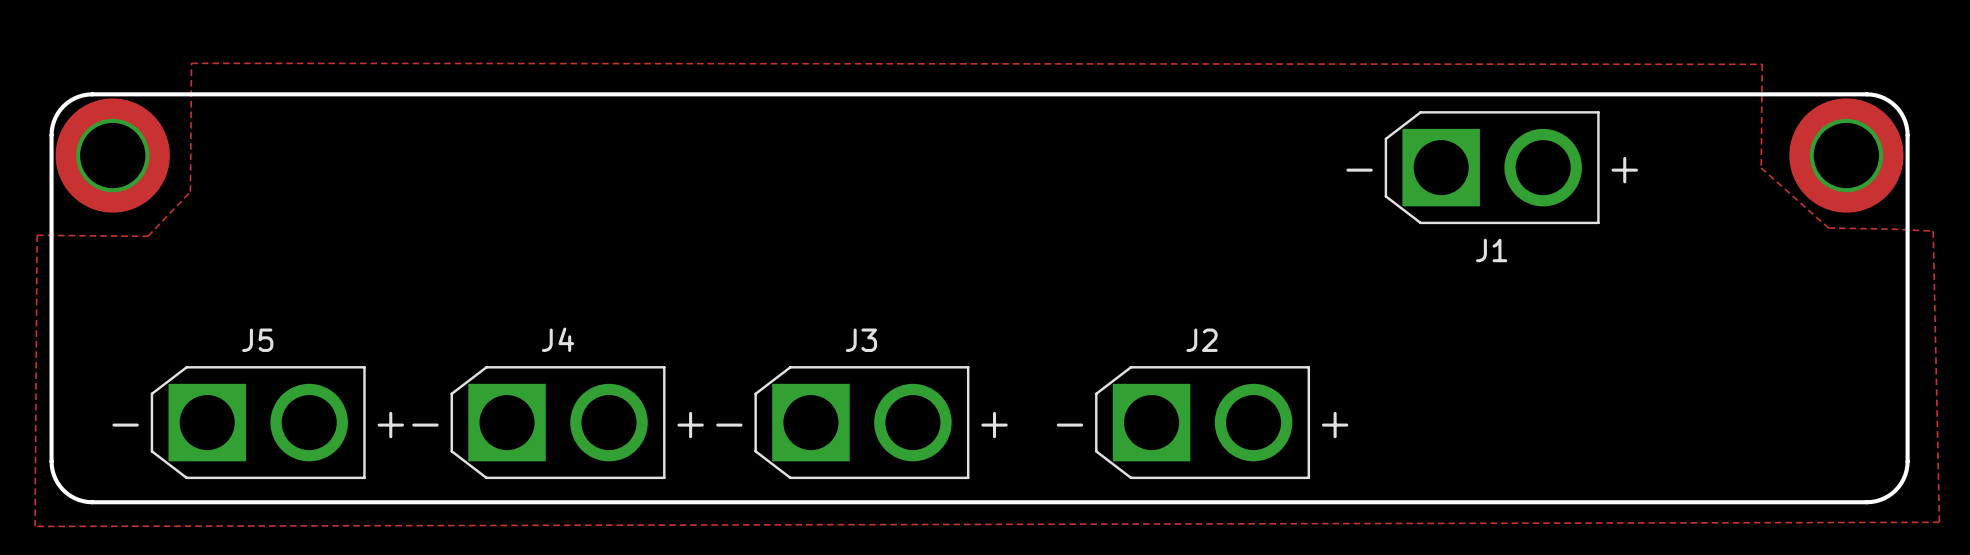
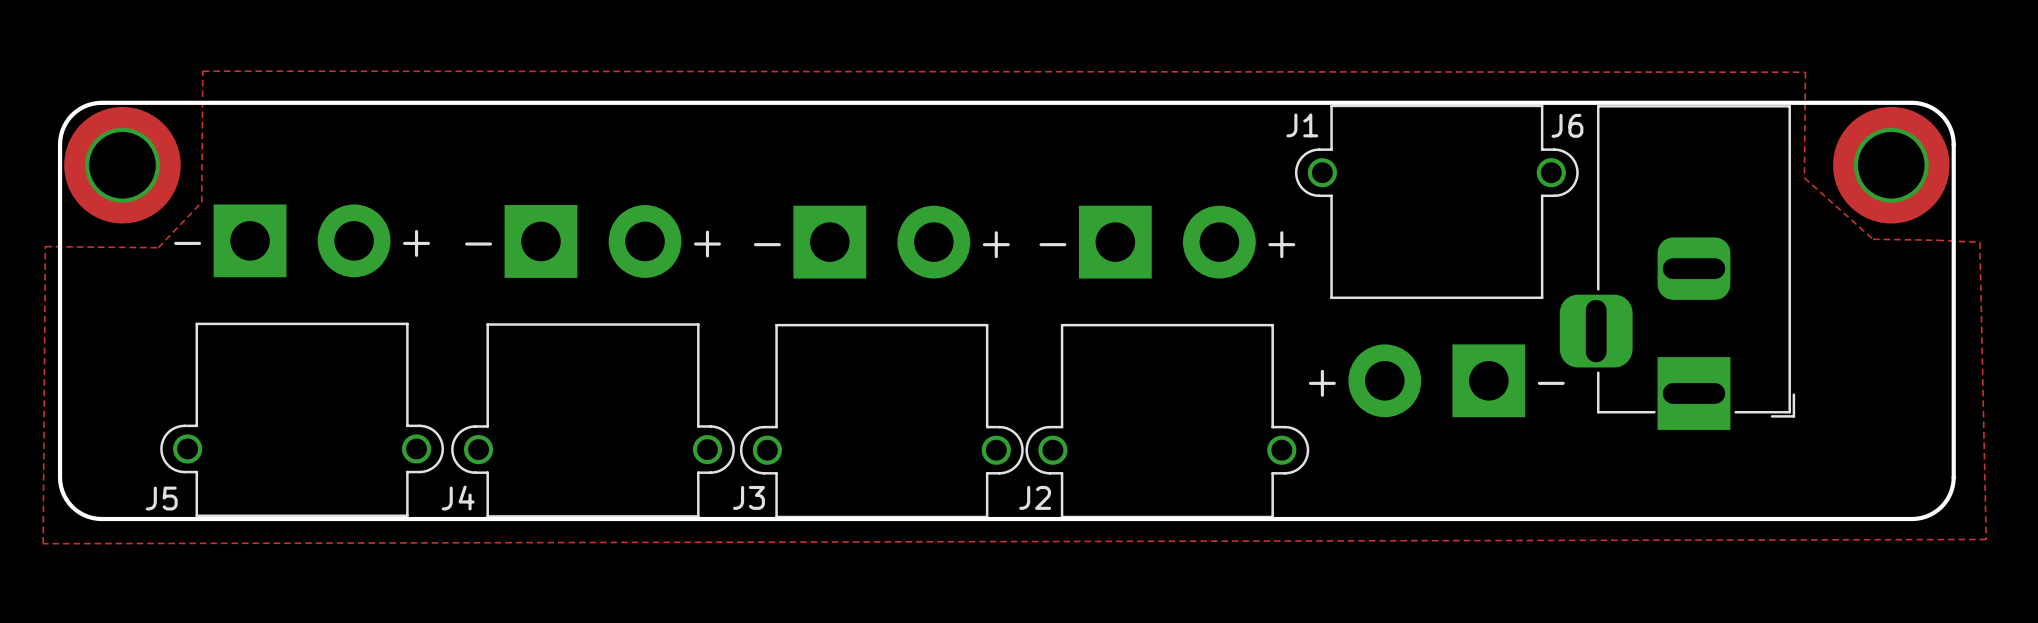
J1 footprint: [1384, 111, 1600, 225] -> [1294, 104, 1579, 418]
J1 name position: J1 (1491, 250) -> J1 (1302, 125)
J6: none -> (1677, 267)
J4 name position: J4 (558, 339) -> J4 (458, 498)
J5 name position: J5 (257, 340) -> J5 (161, 498)
J3 name position: J3 (861, 340) -> J3 (749, 497)
J2 name position: J2 (1202, 340) -> J2 (1035, 497)
J5 footprint: [150, 366, 366, 480] -> [160, 204, 445, 518]
J4 footprint: [450, 366, 666, 480] -> [451, 205, 735, 518]
J3 footprint: [754, 366, 970, 480] -> [739, 205, 1024, 519]
J2 footprint: [1095, 366, 1311, 480] -> [1025, 205, 1310, 519]

